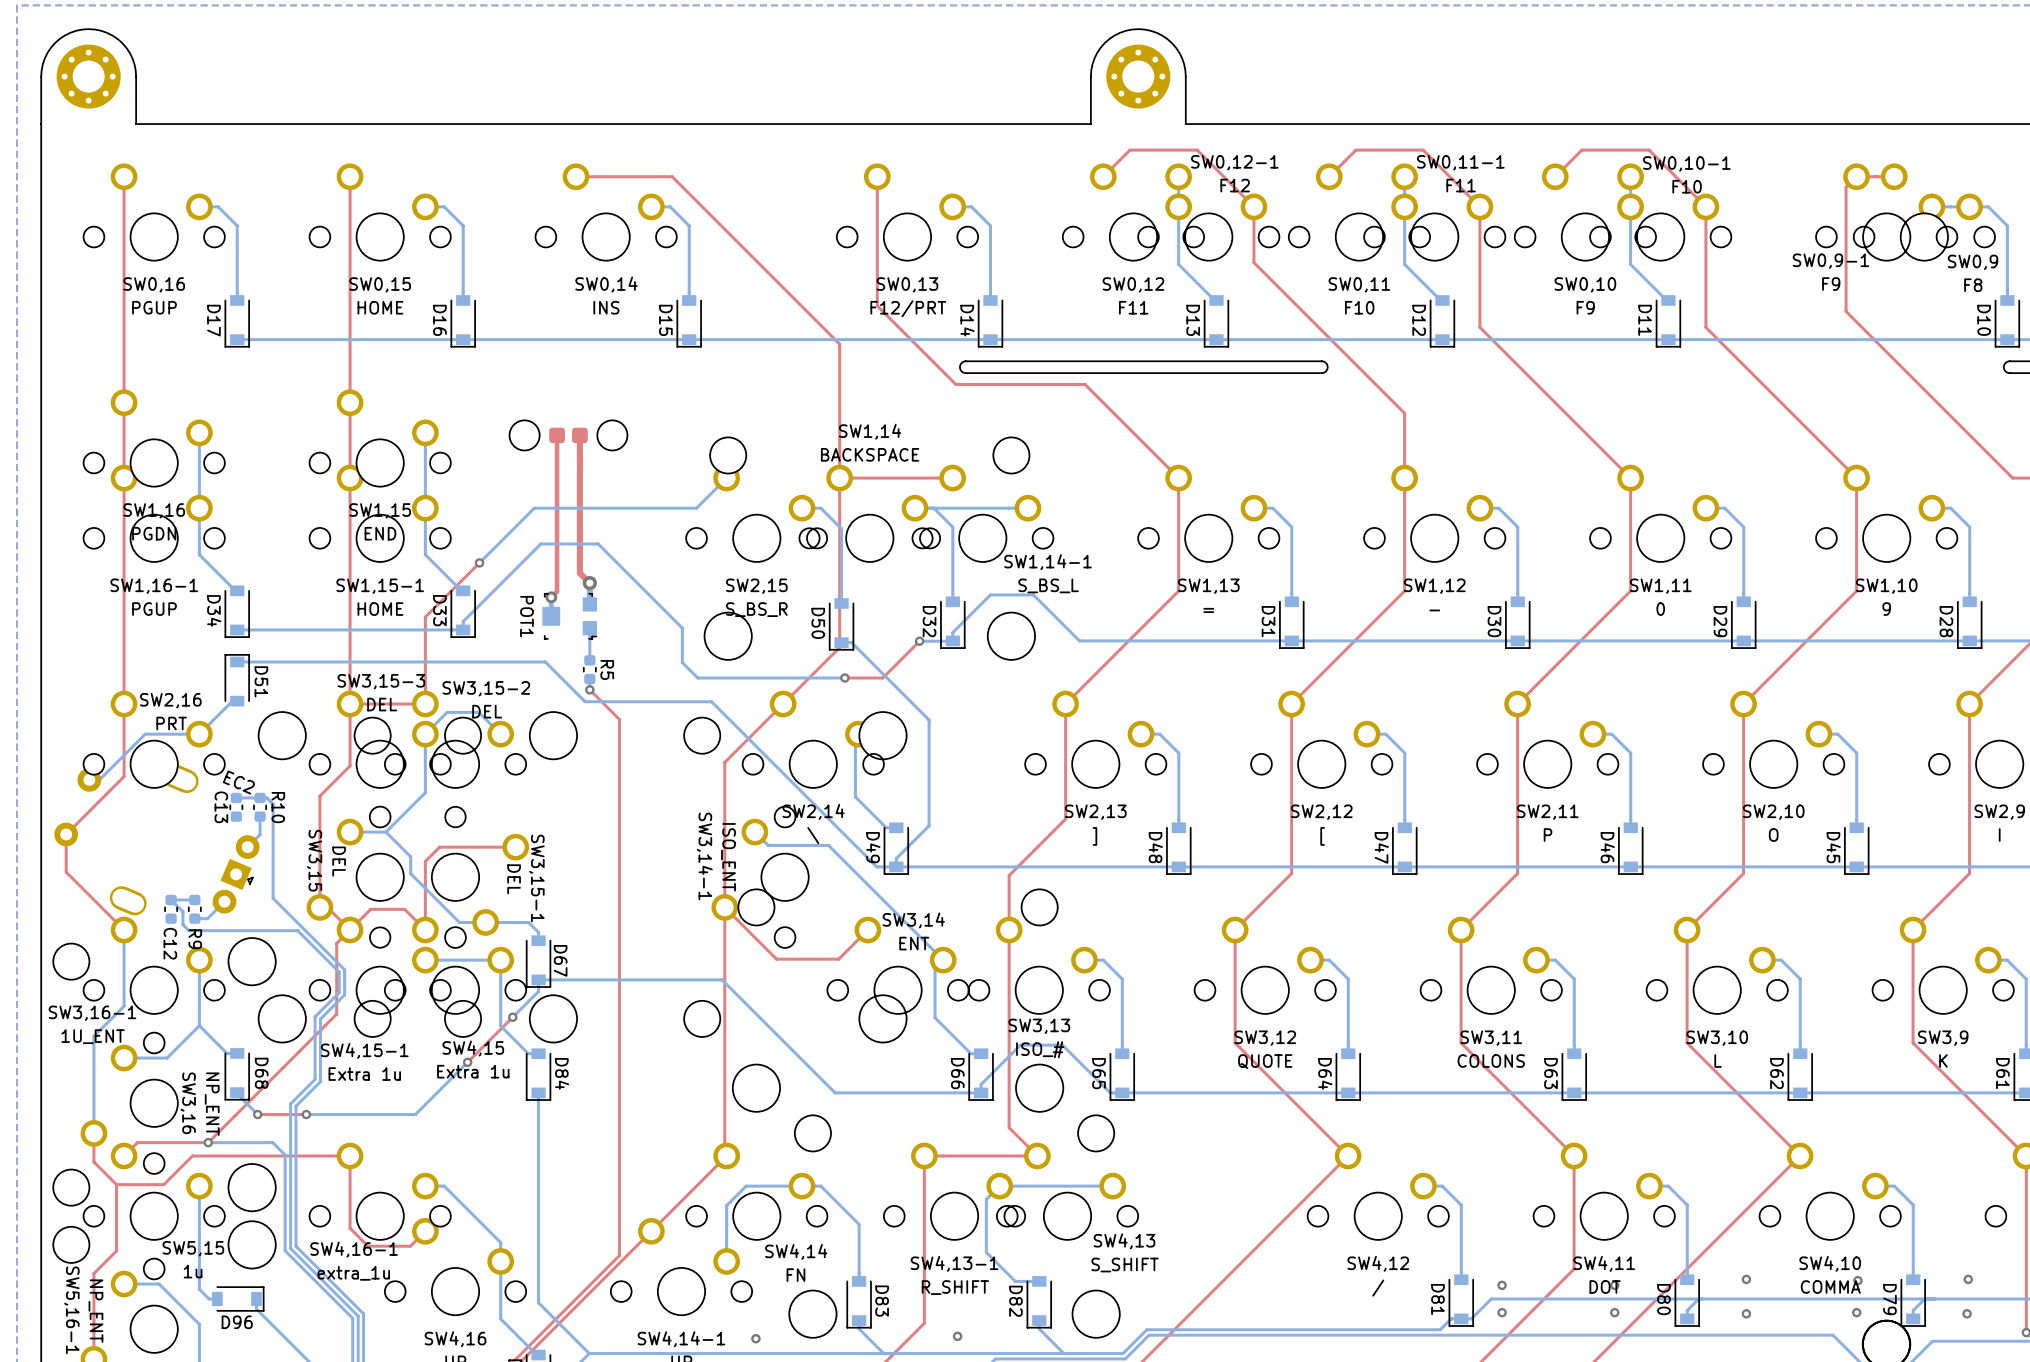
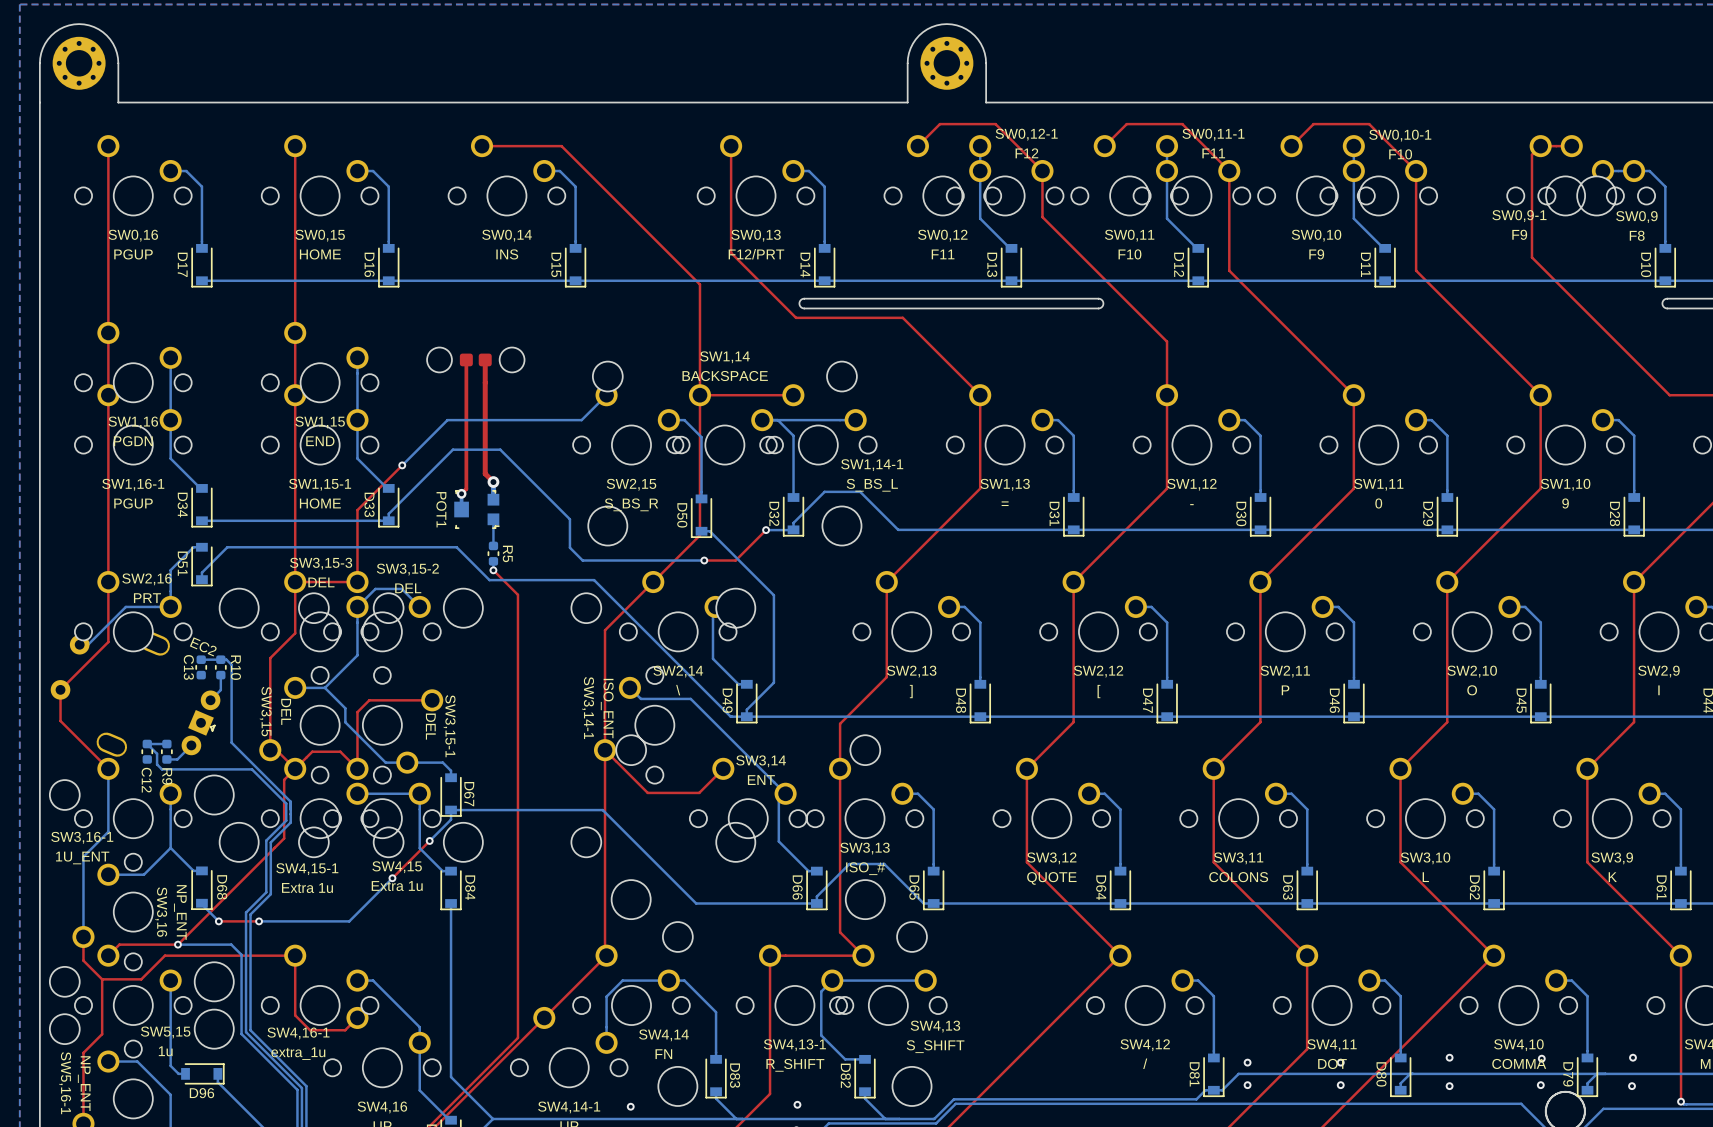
bottom track: (268, 661) (237, 661) -> (227, 547) (201, 572) (201, 579)
D51 rotation: 0° (237, 680) -> 180° (201, 564)
bottom track: (237, 701) (232, 701) (199, 734) -> (201, 547) (193, 547) (170, 570) (170, 606)

